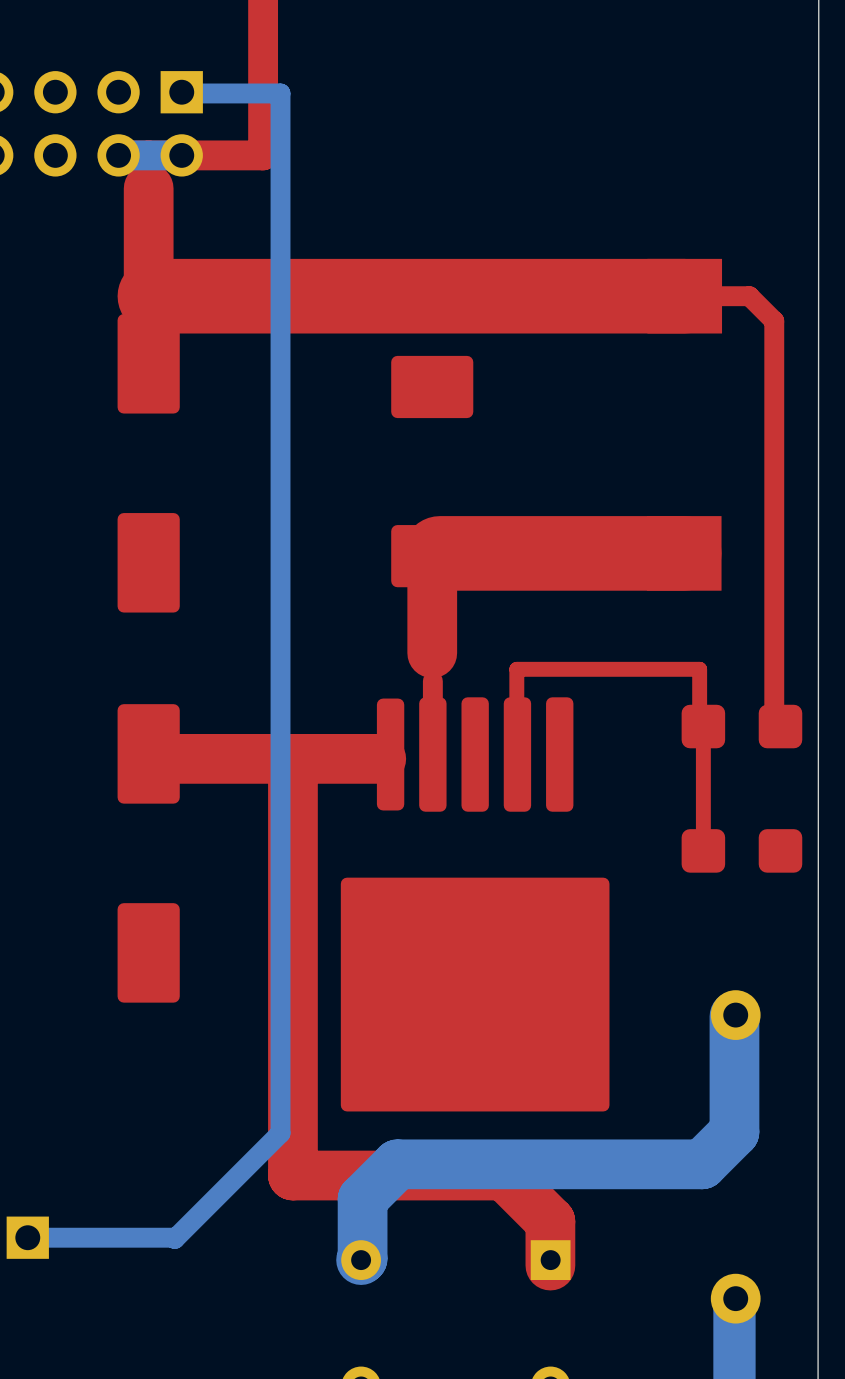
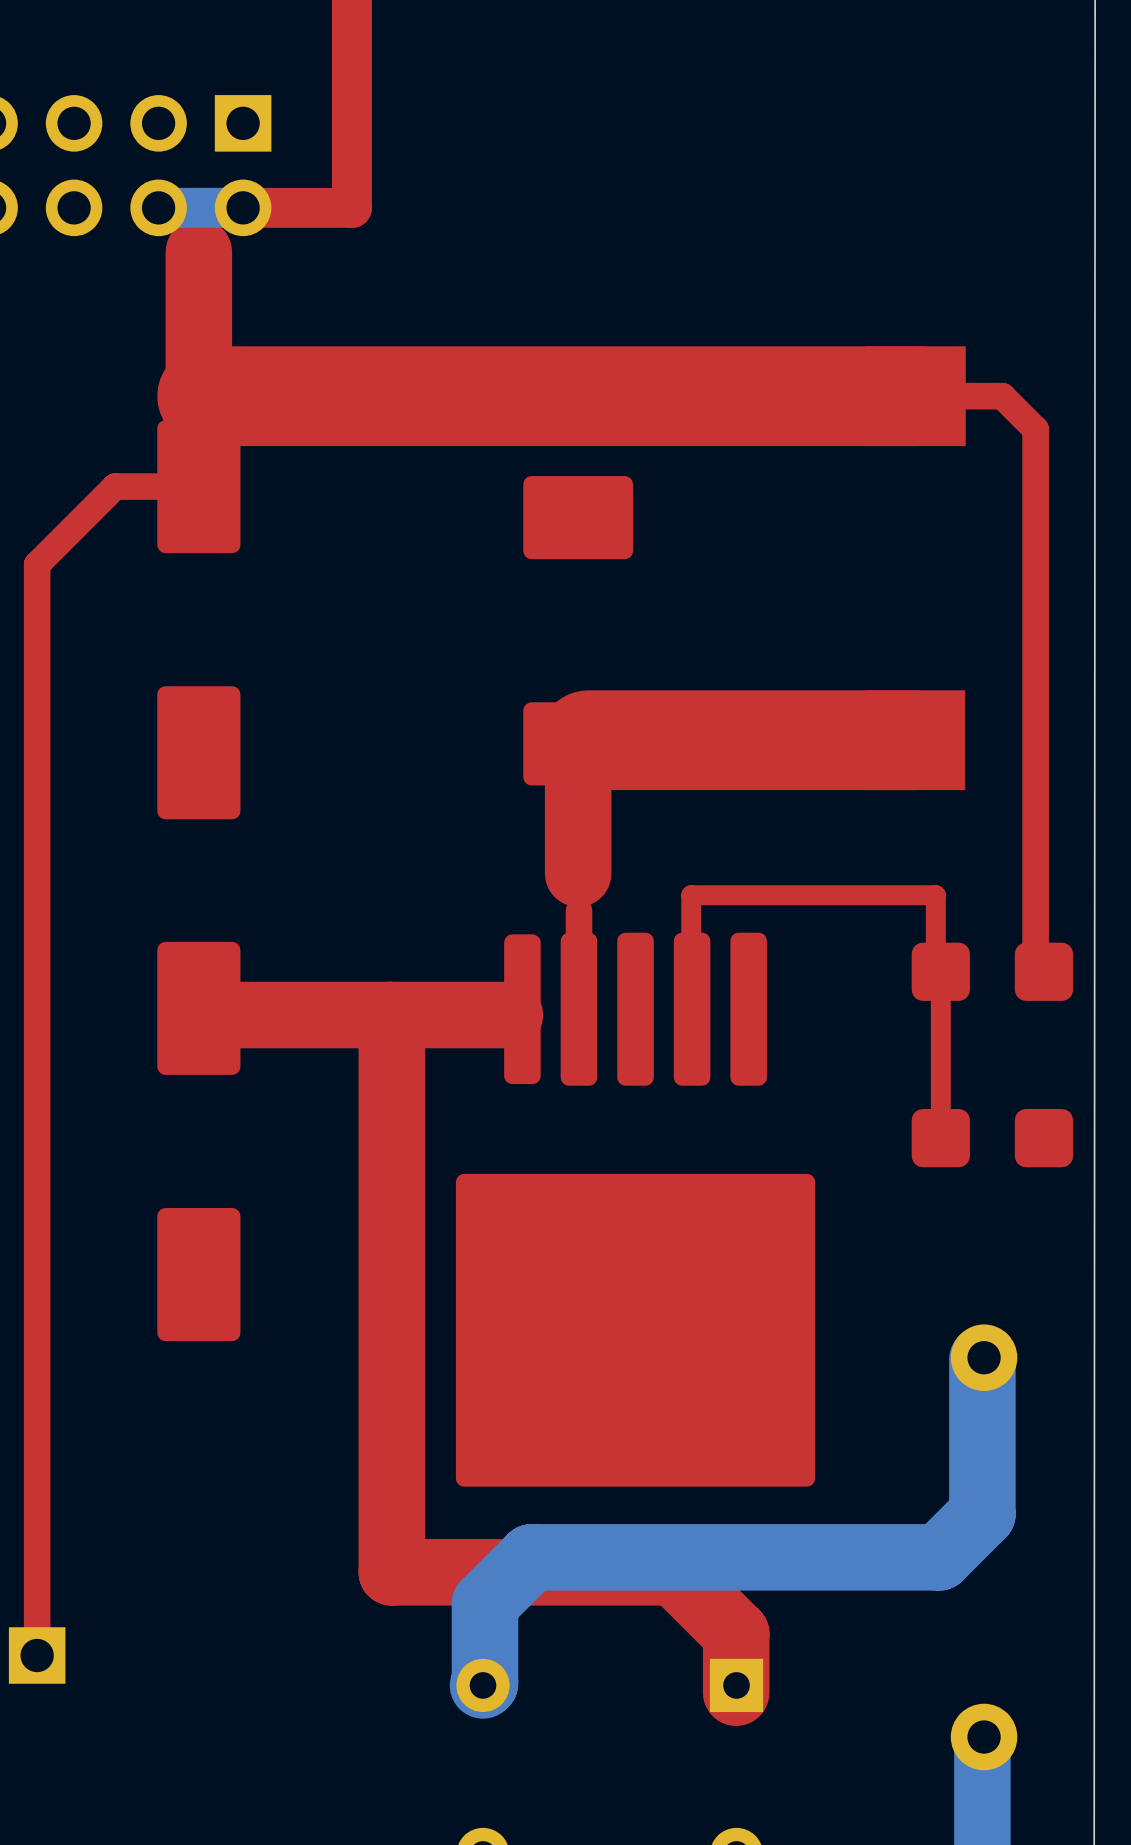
bottom track: (181, 92) (280, 93) (280, 1133) (174, 1238) (27, 1237) -> none
top track: none -> (198, 486) (115, 486) (37, 564) (37, 1655)

